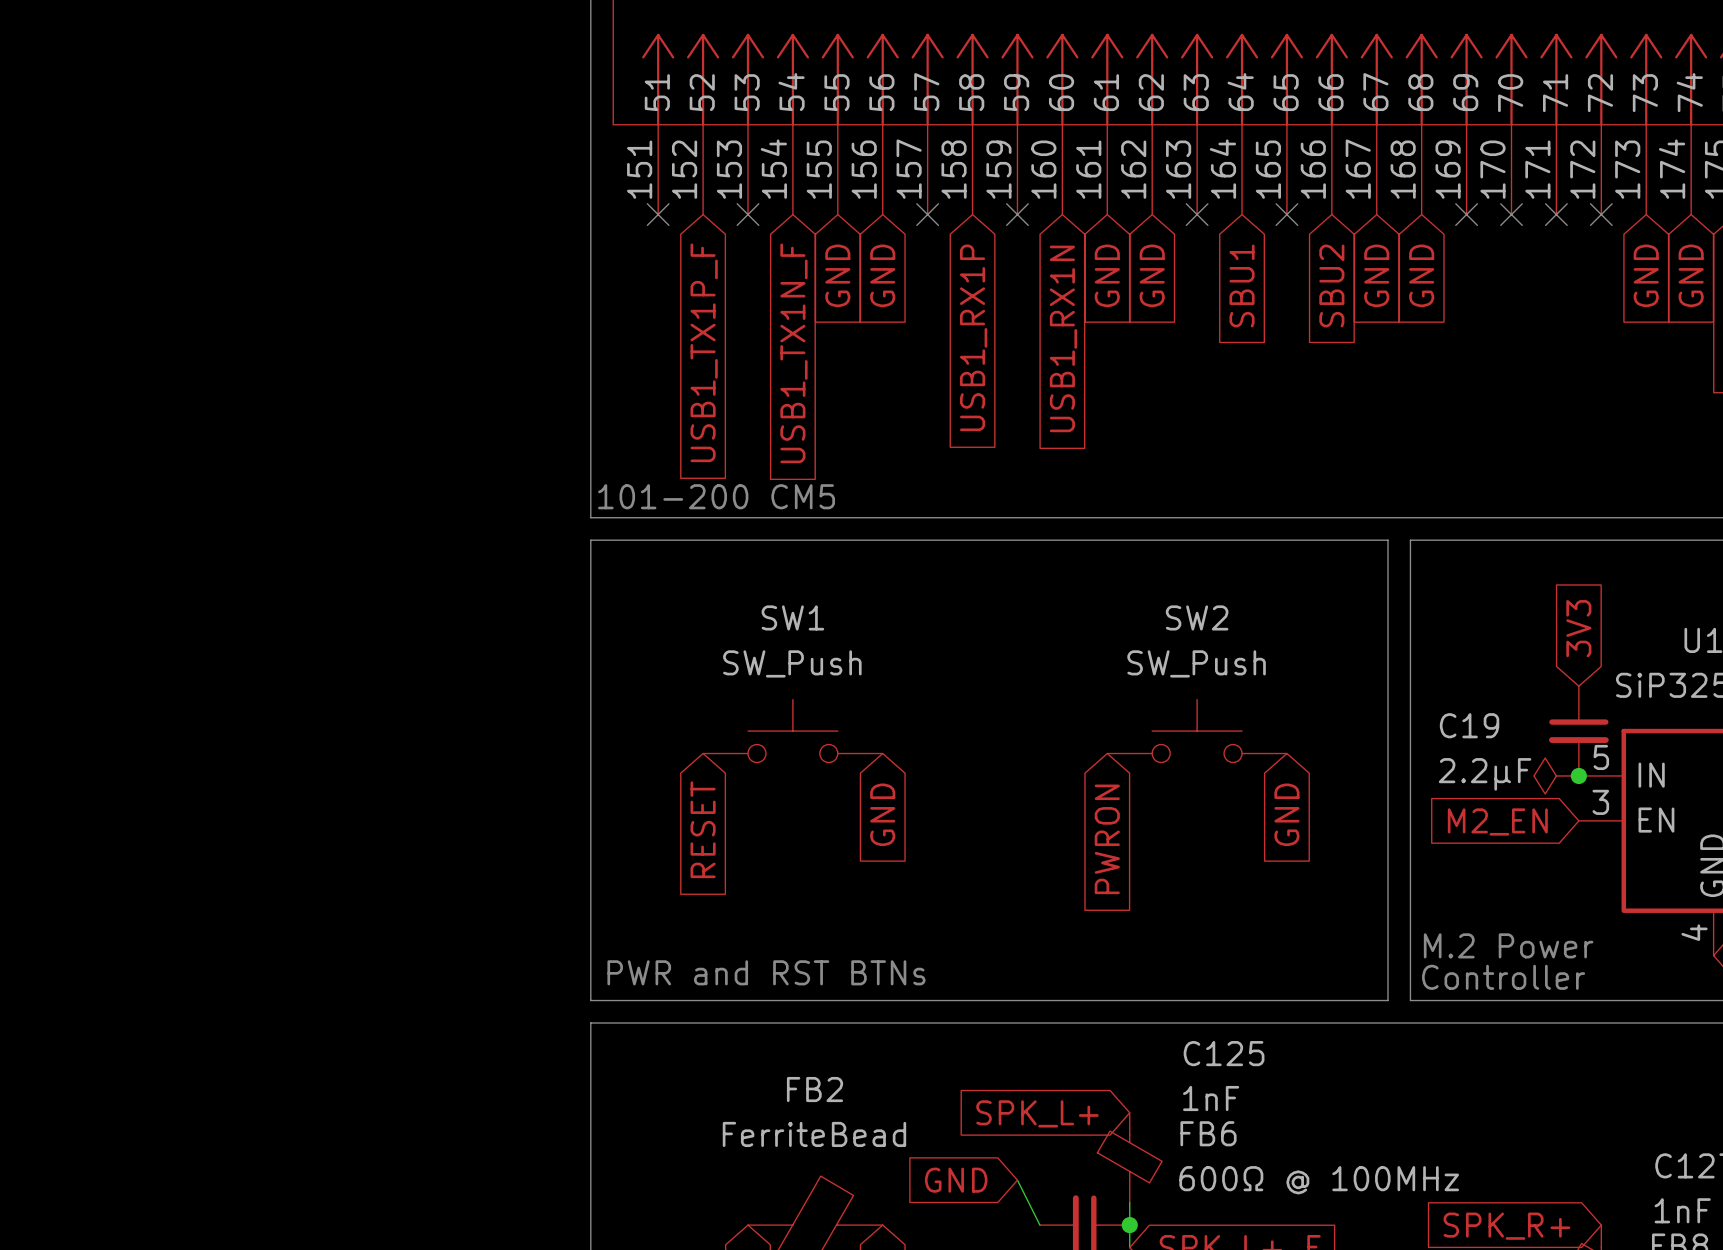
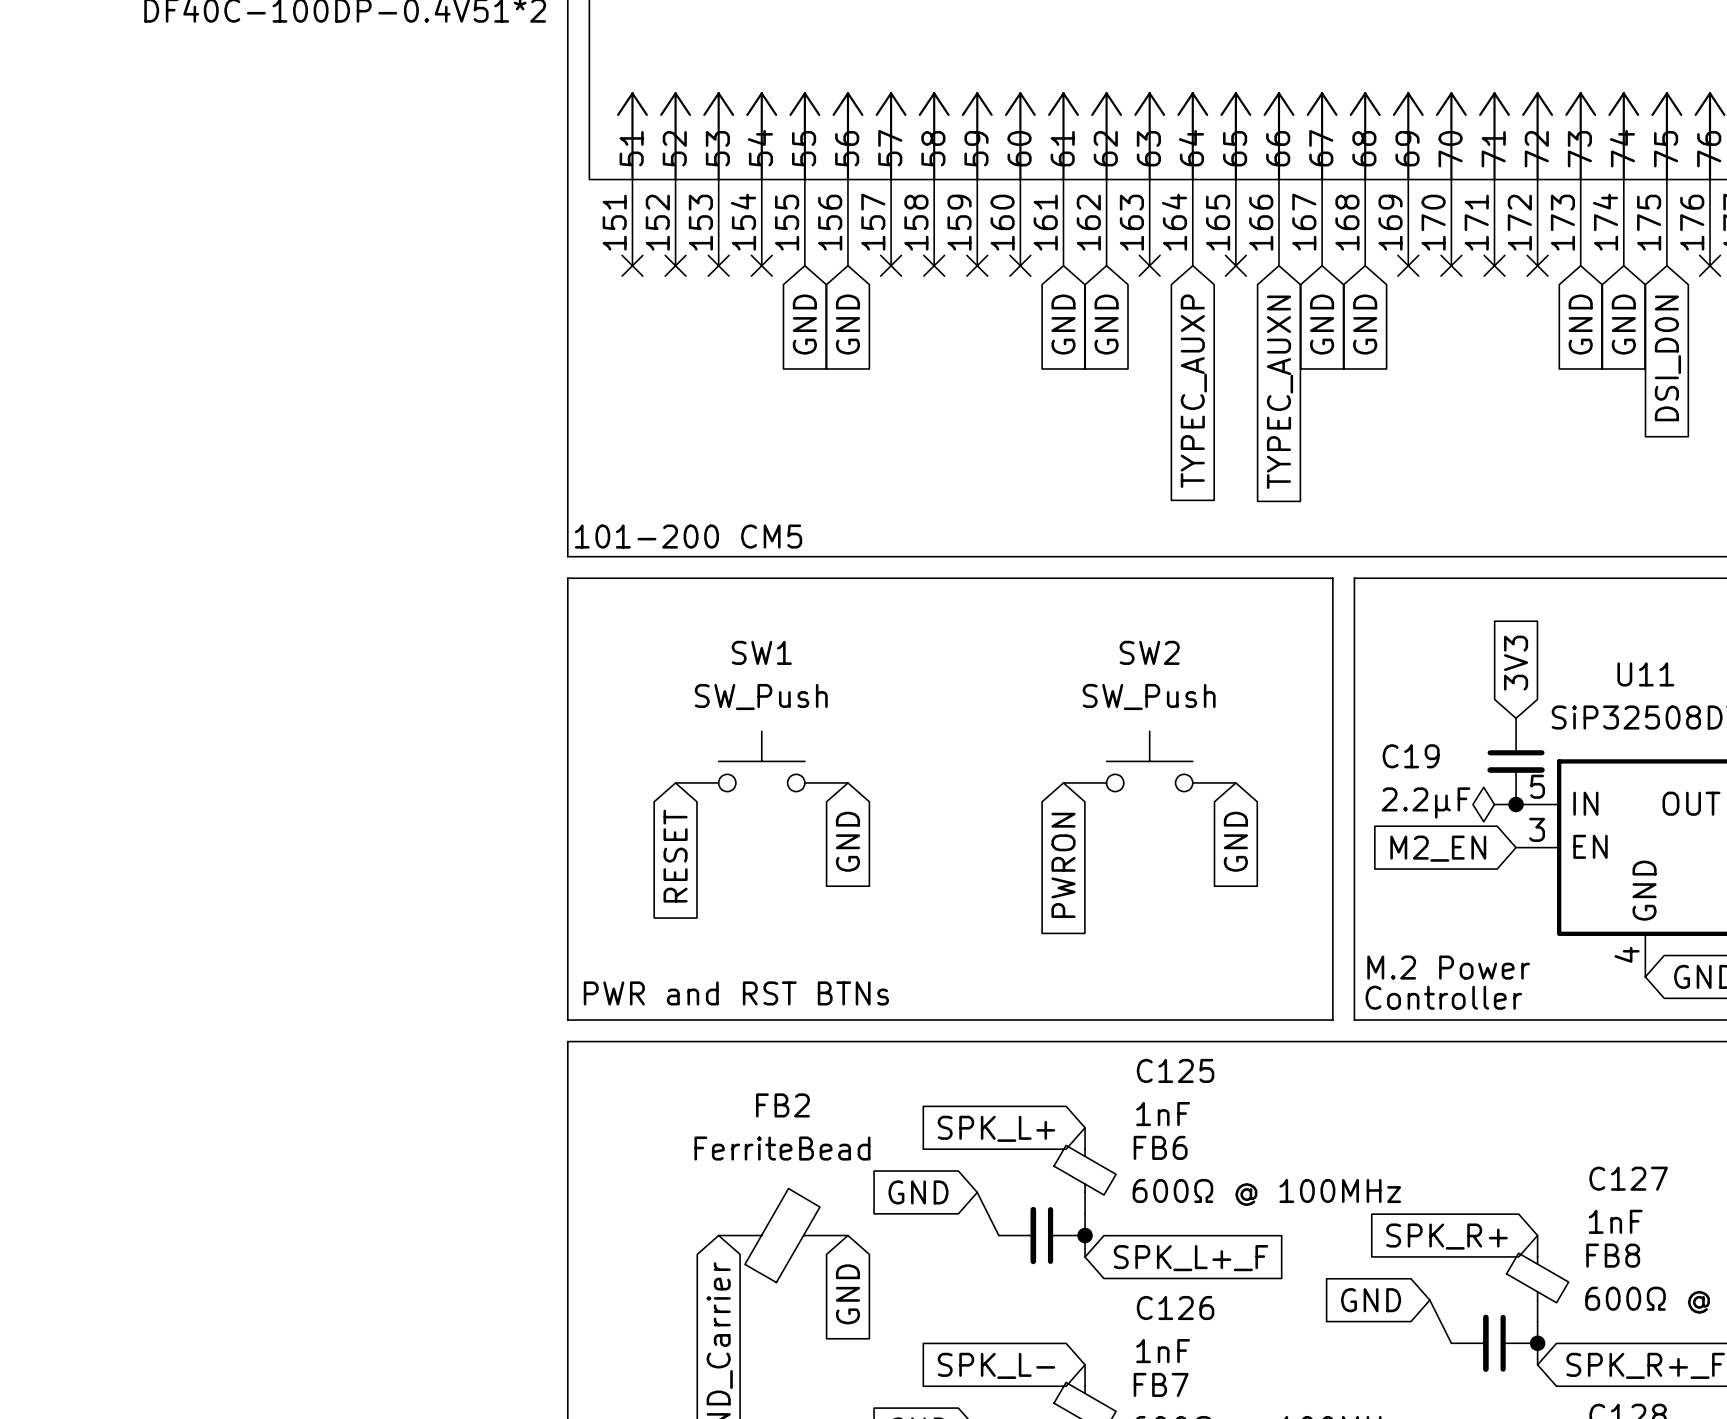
no-connect mark: none -> (675, 265)
no-connect mark: none -> (761, 265)
no-connect mark: none -> (934, 265)
no-connect mark: none -> (1020, 265)
global label: SBU1 (1242, 285) -> TYPEC_AUXP (1193, 391)
global label: SBU2 (1331, 285) -> TYPEC_AUXN (1280, 392)
global label: USB1_RX1P (973, 337) -> none
global label: USB1_RX1N (1063, 338) -> none
global label: USB1_TX1P_F (704, 352) -> none
global label: USB1_TX1N_F (793, 353) -> none

